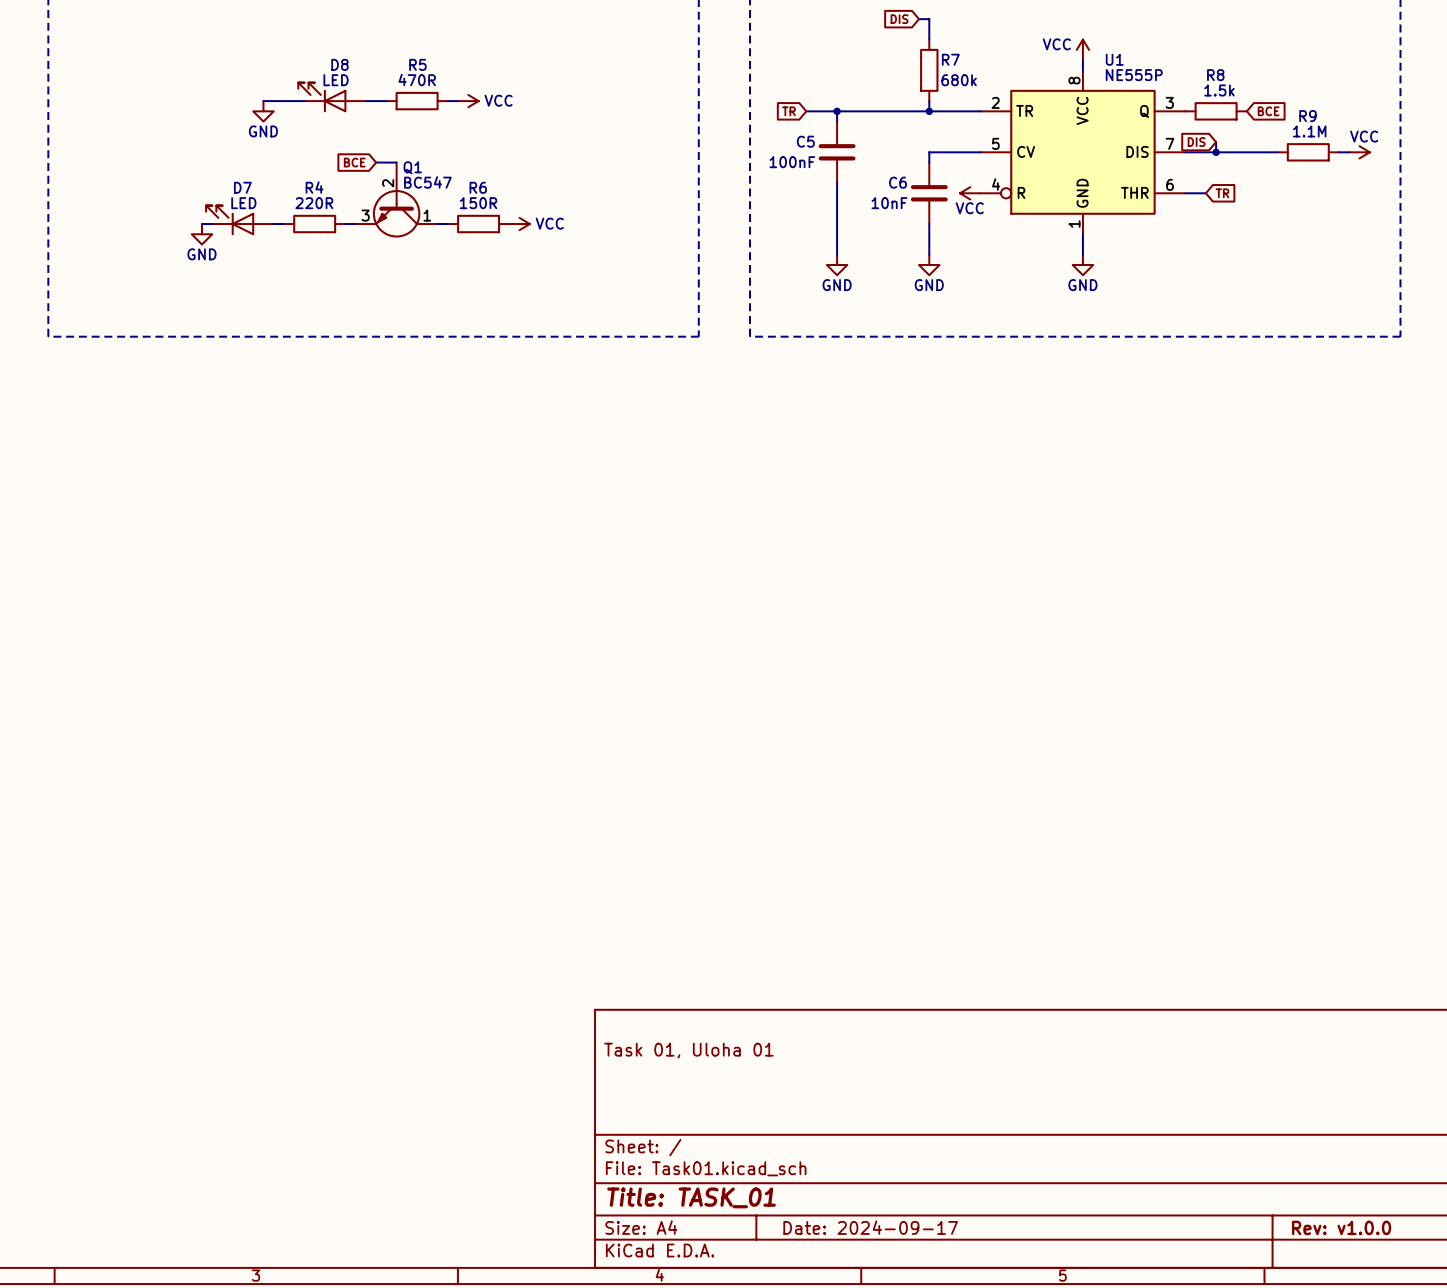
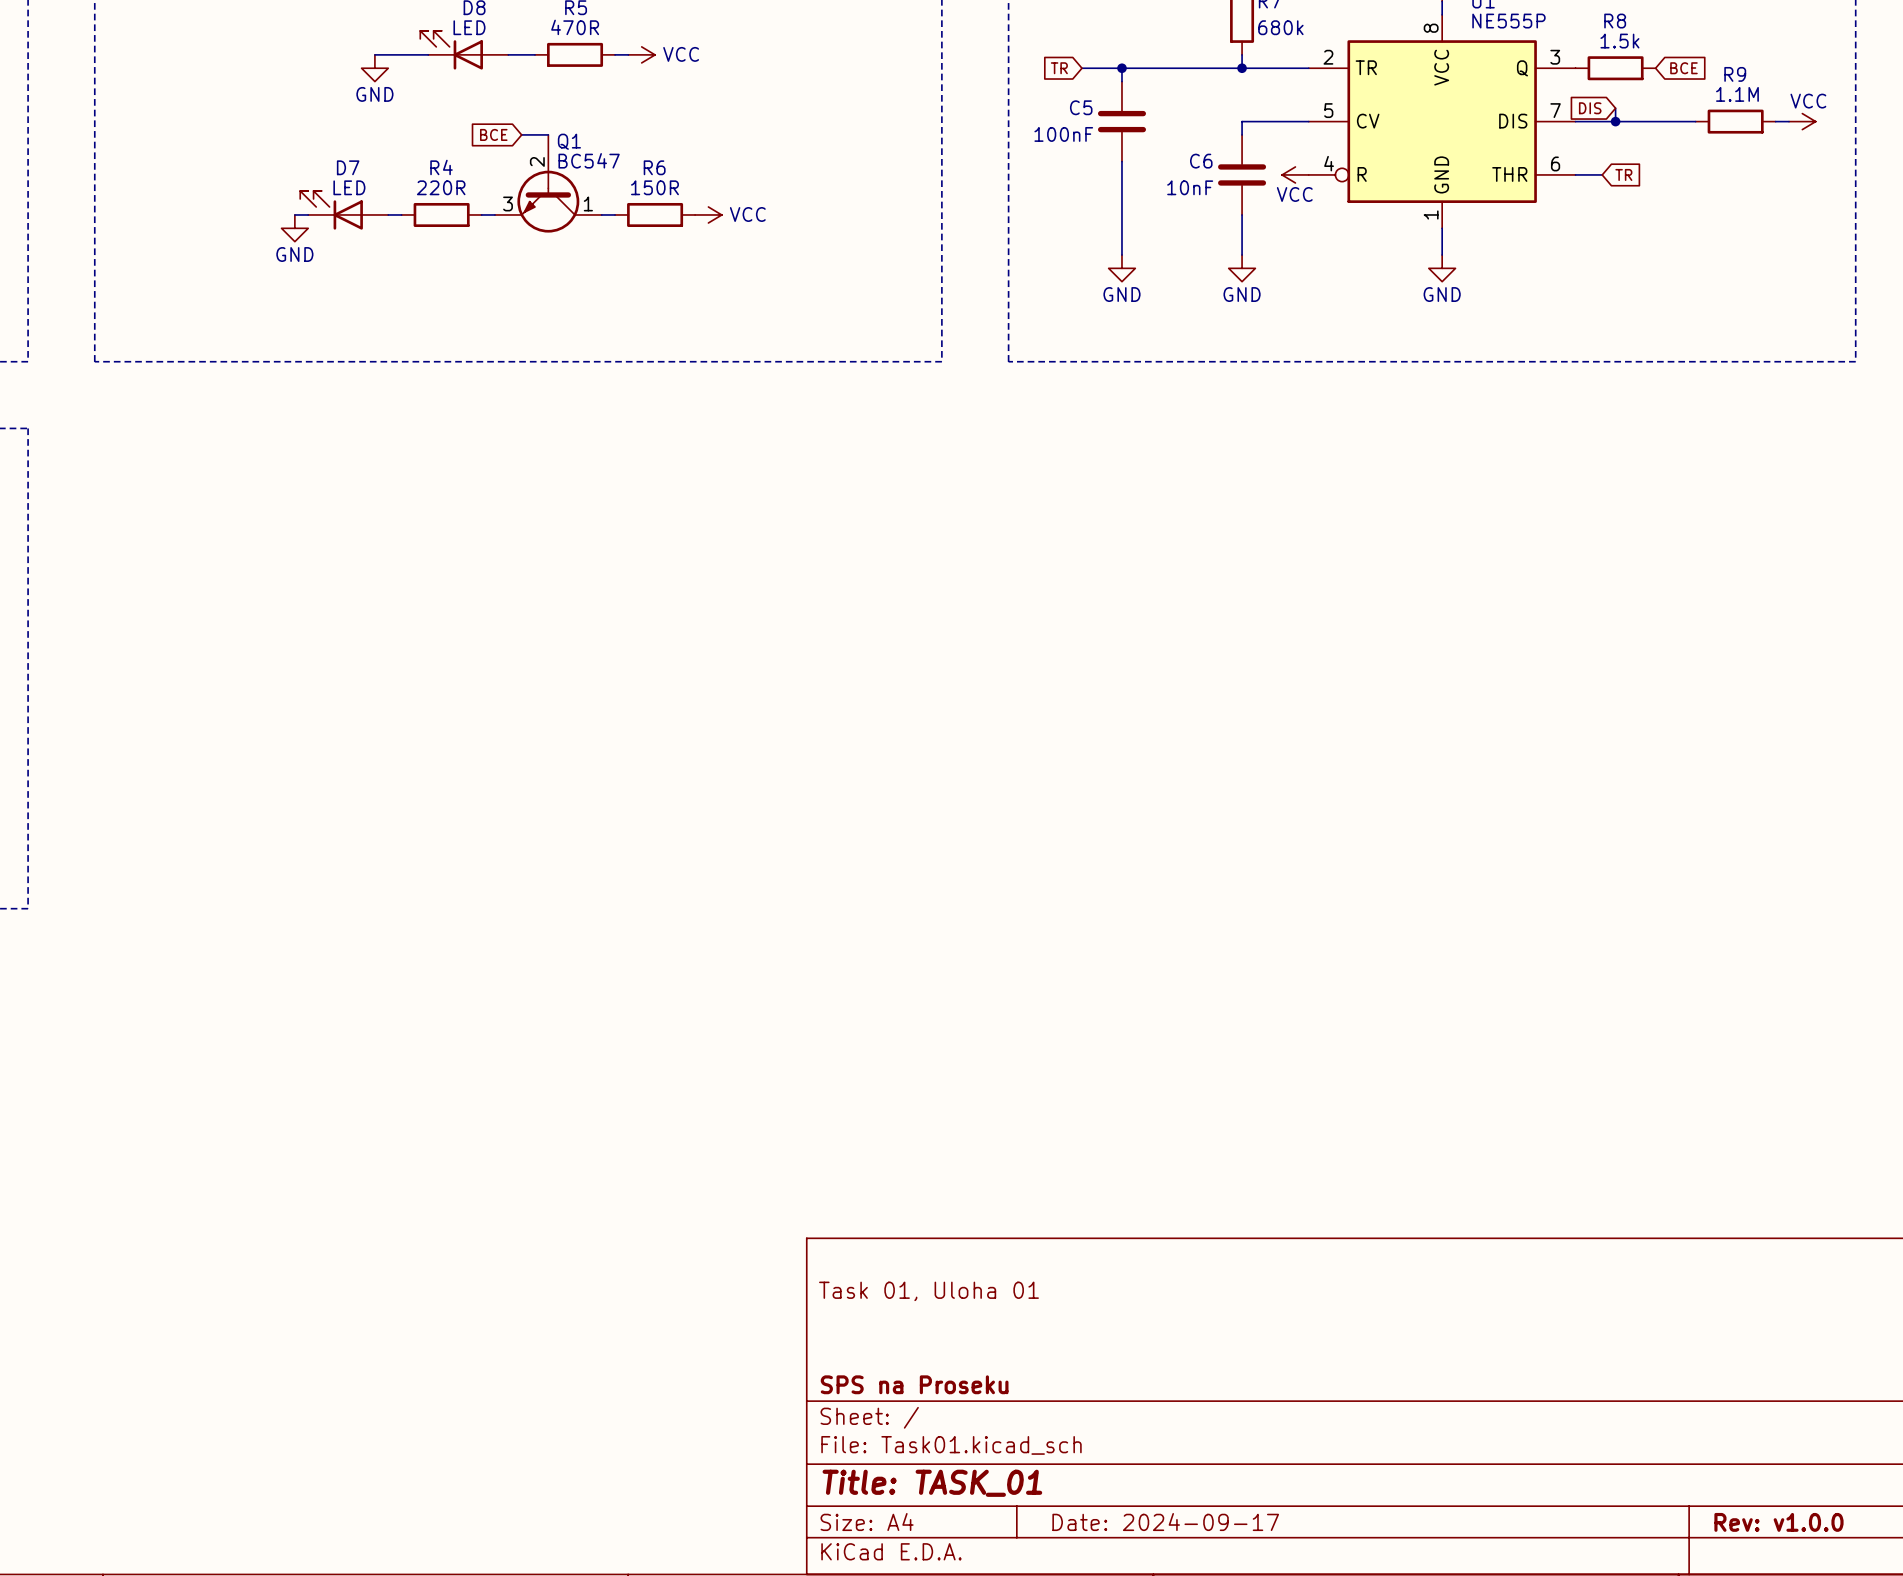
title block: none -> SPS na Proseku (914, 1384)

